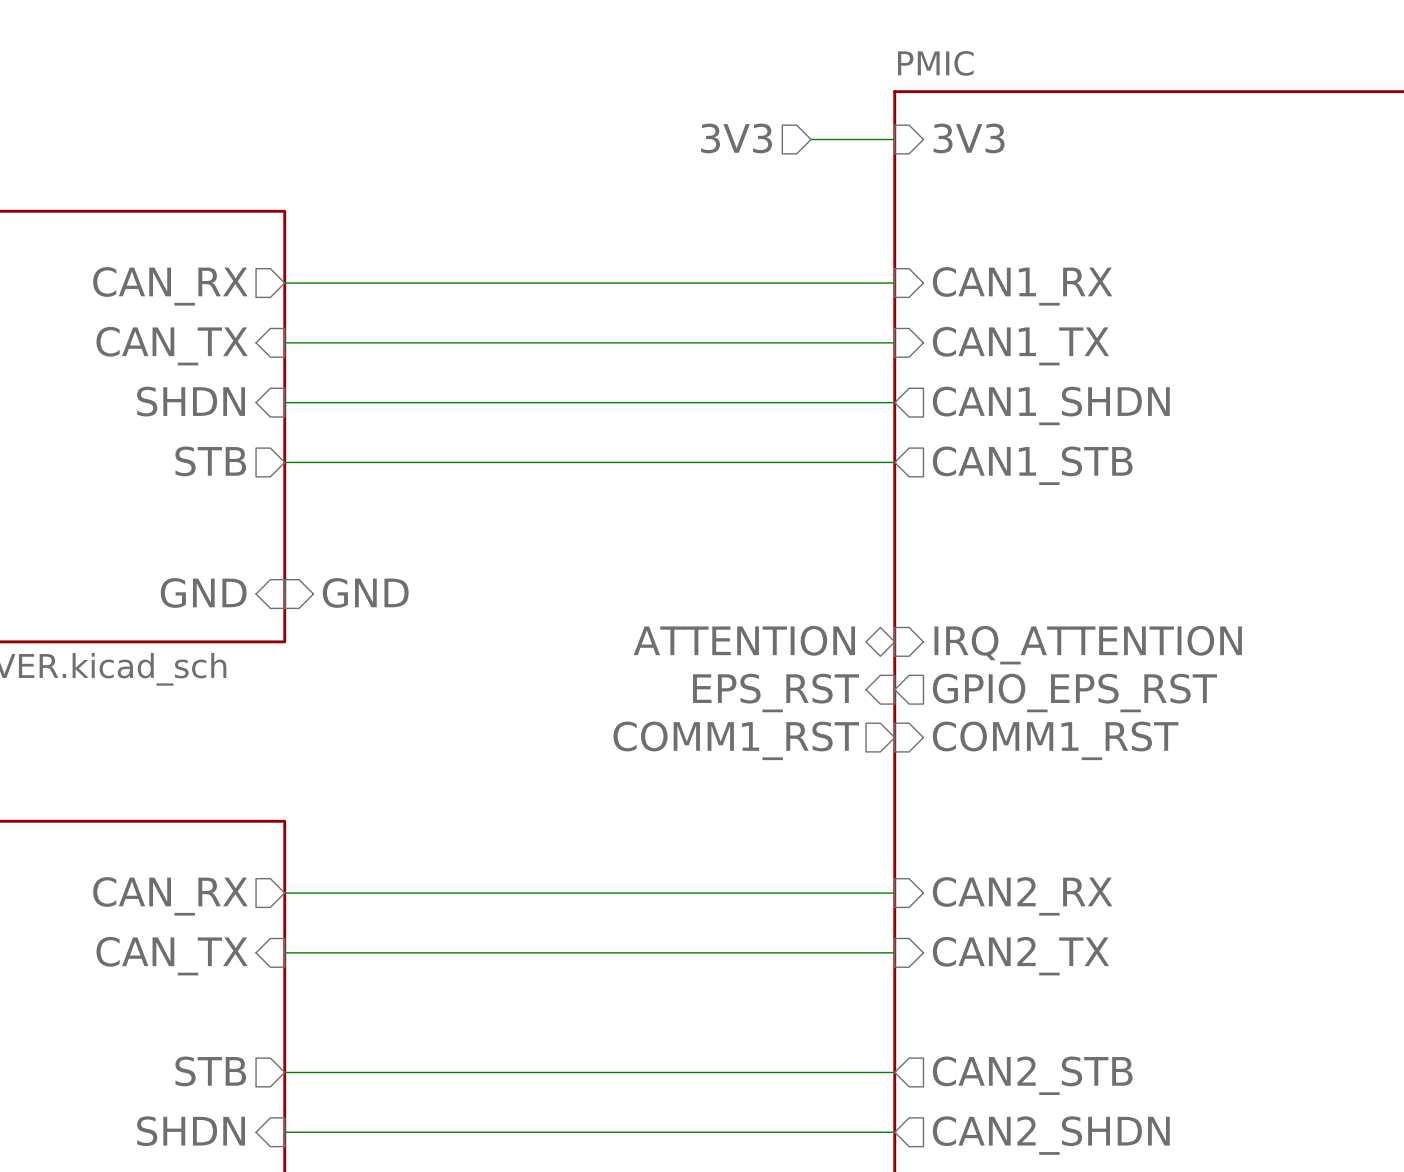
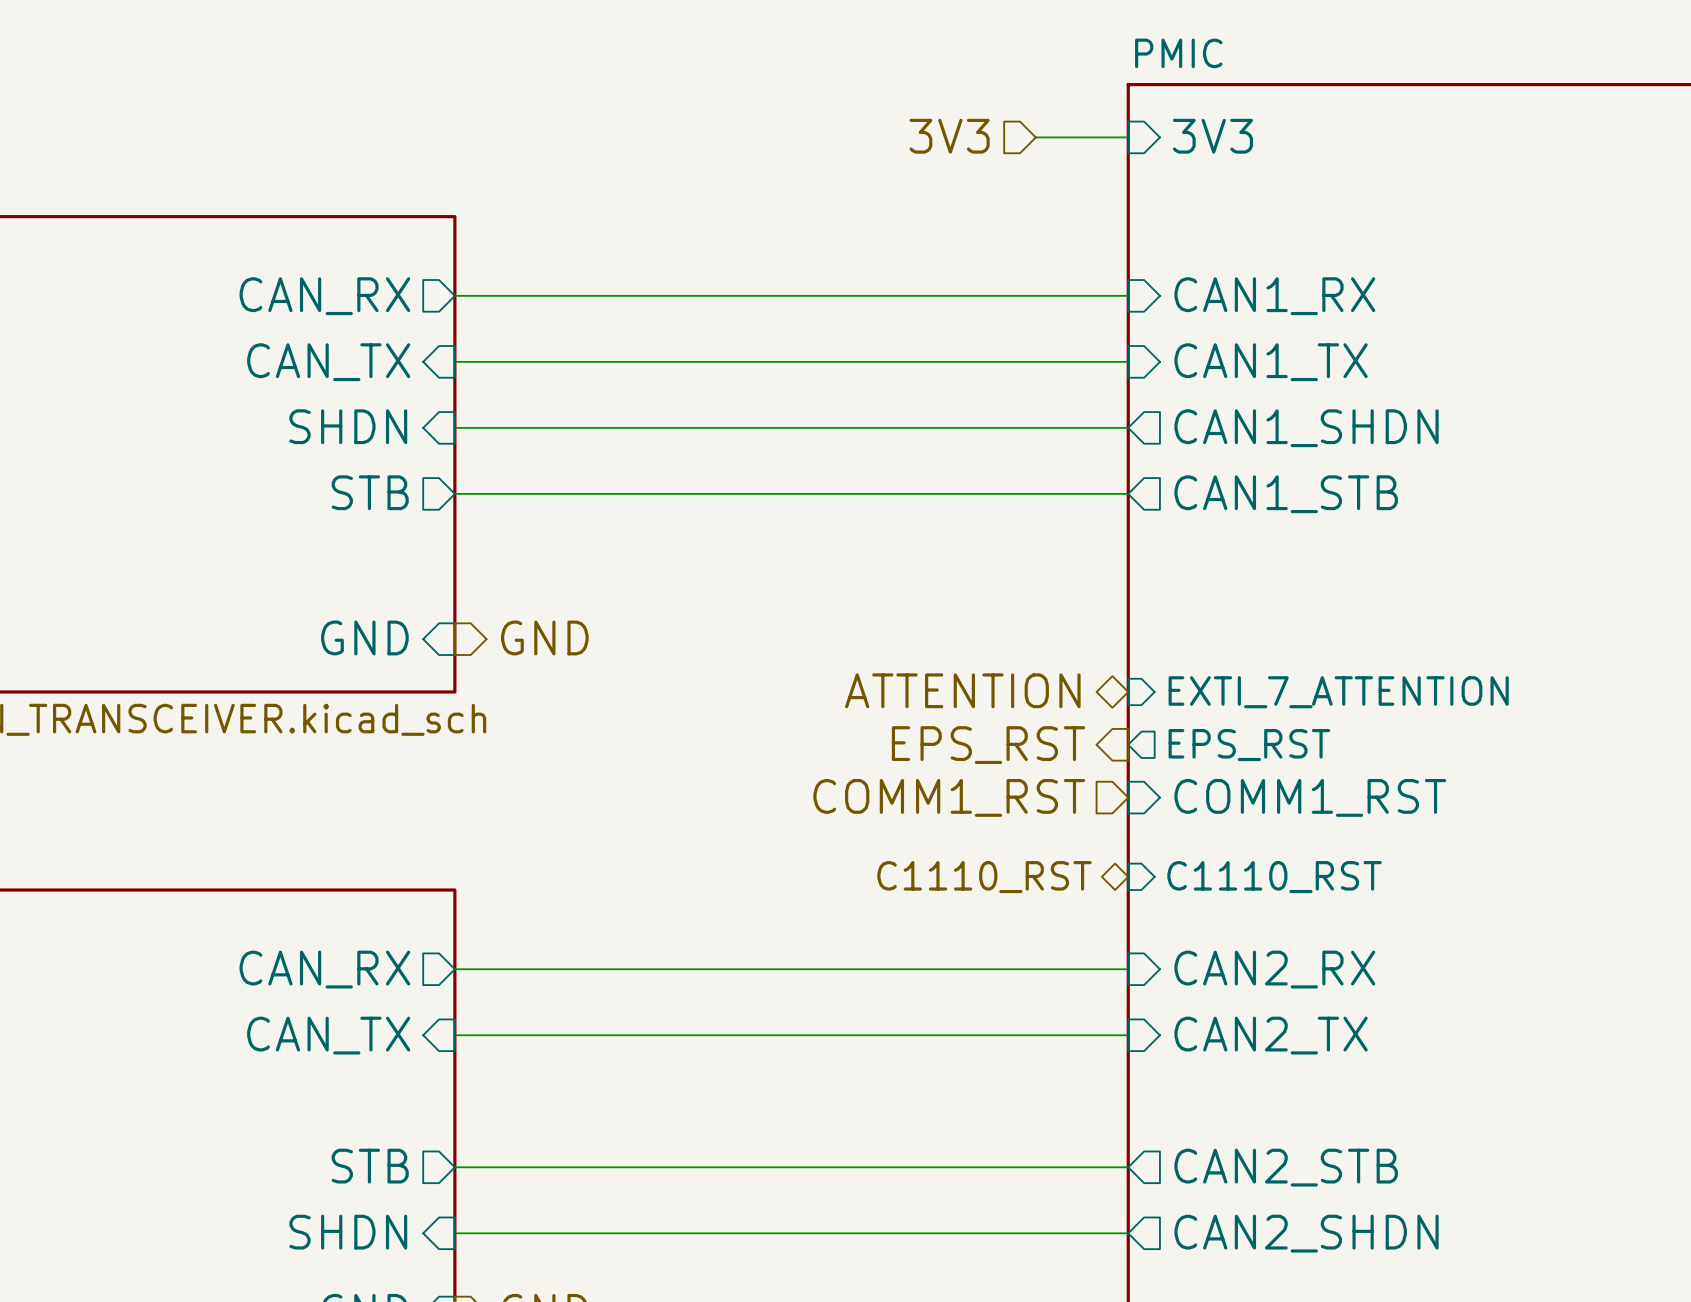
sheet pin: IRQ_ATTENTION (1088, 645) -> EXTI_7_ATTENTION (1338, 692)
sheet pin: GPIO_EPS_RST (1074, 693) -> EPS_RST (1249, 745)
hierarchical label: none -> C1110_RST (984, 877)
sheet pin: none -> C1110_RST (1274, 877)

